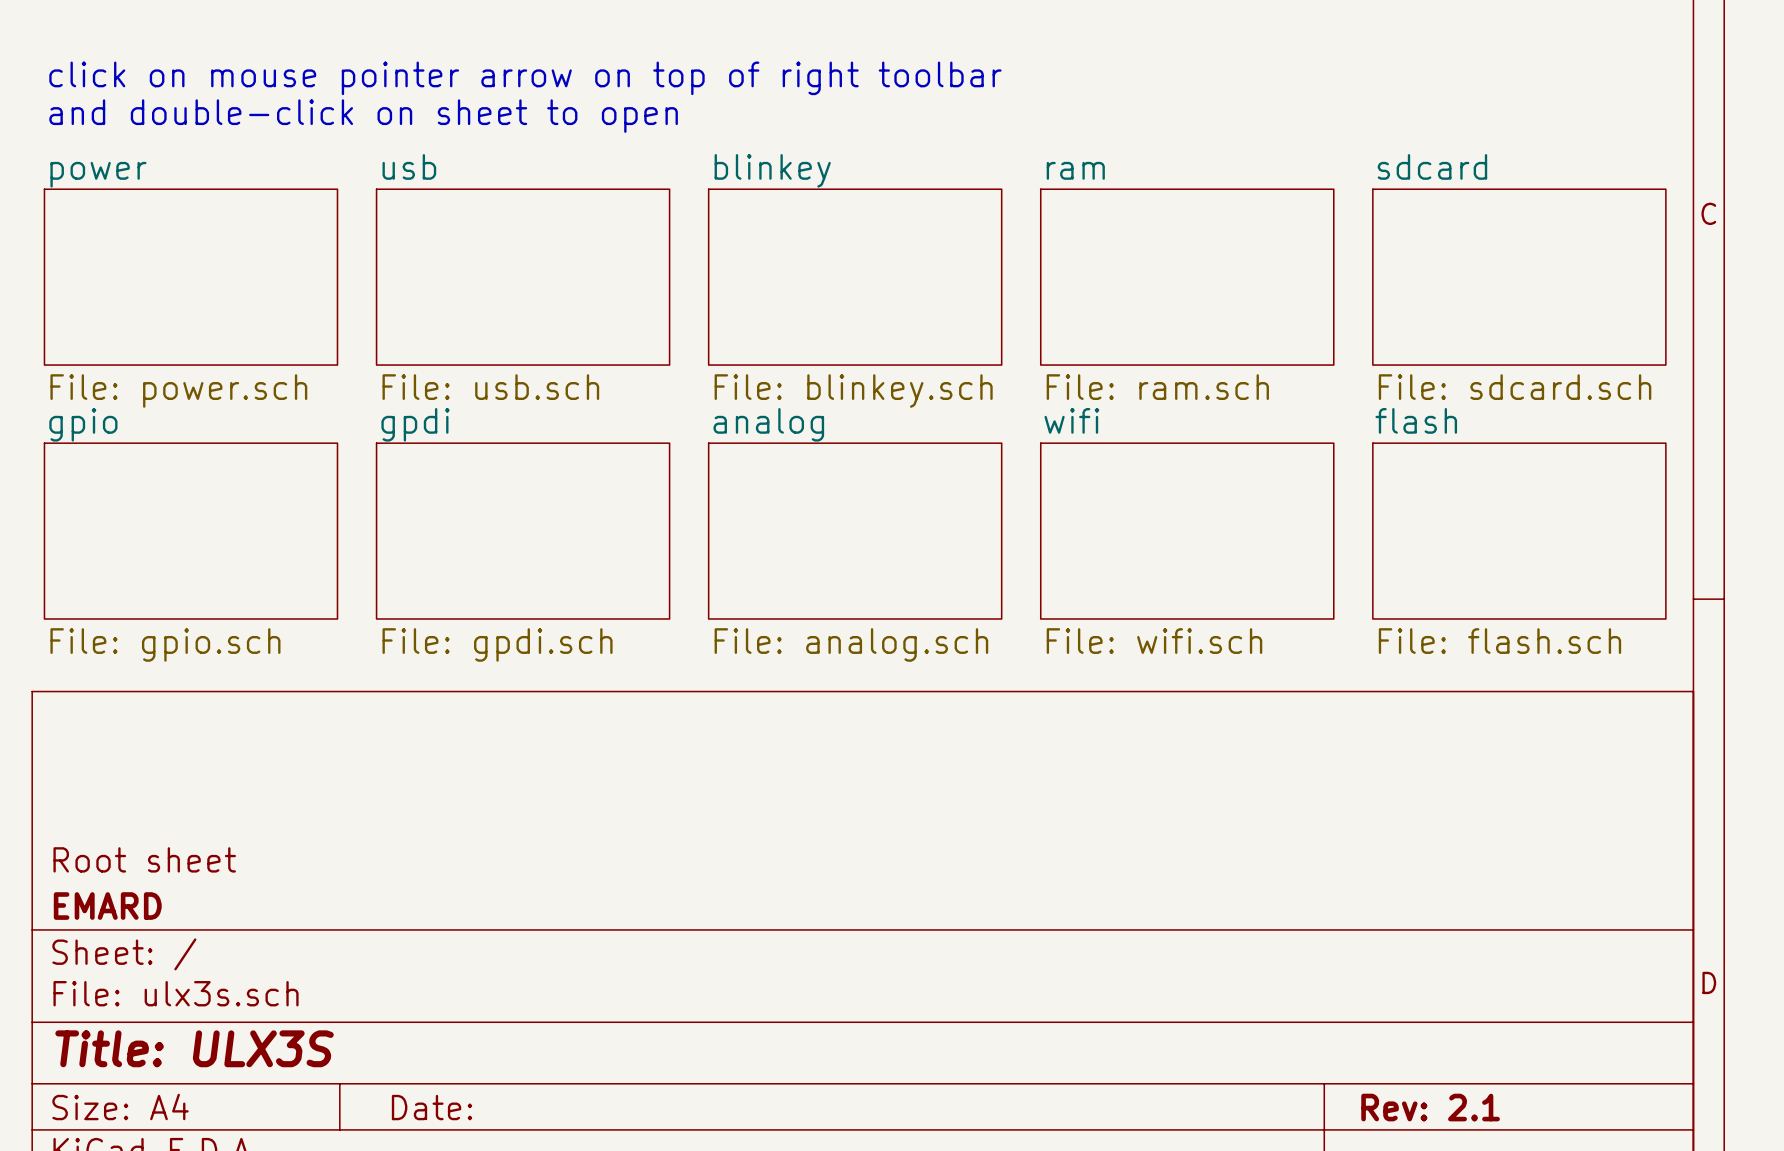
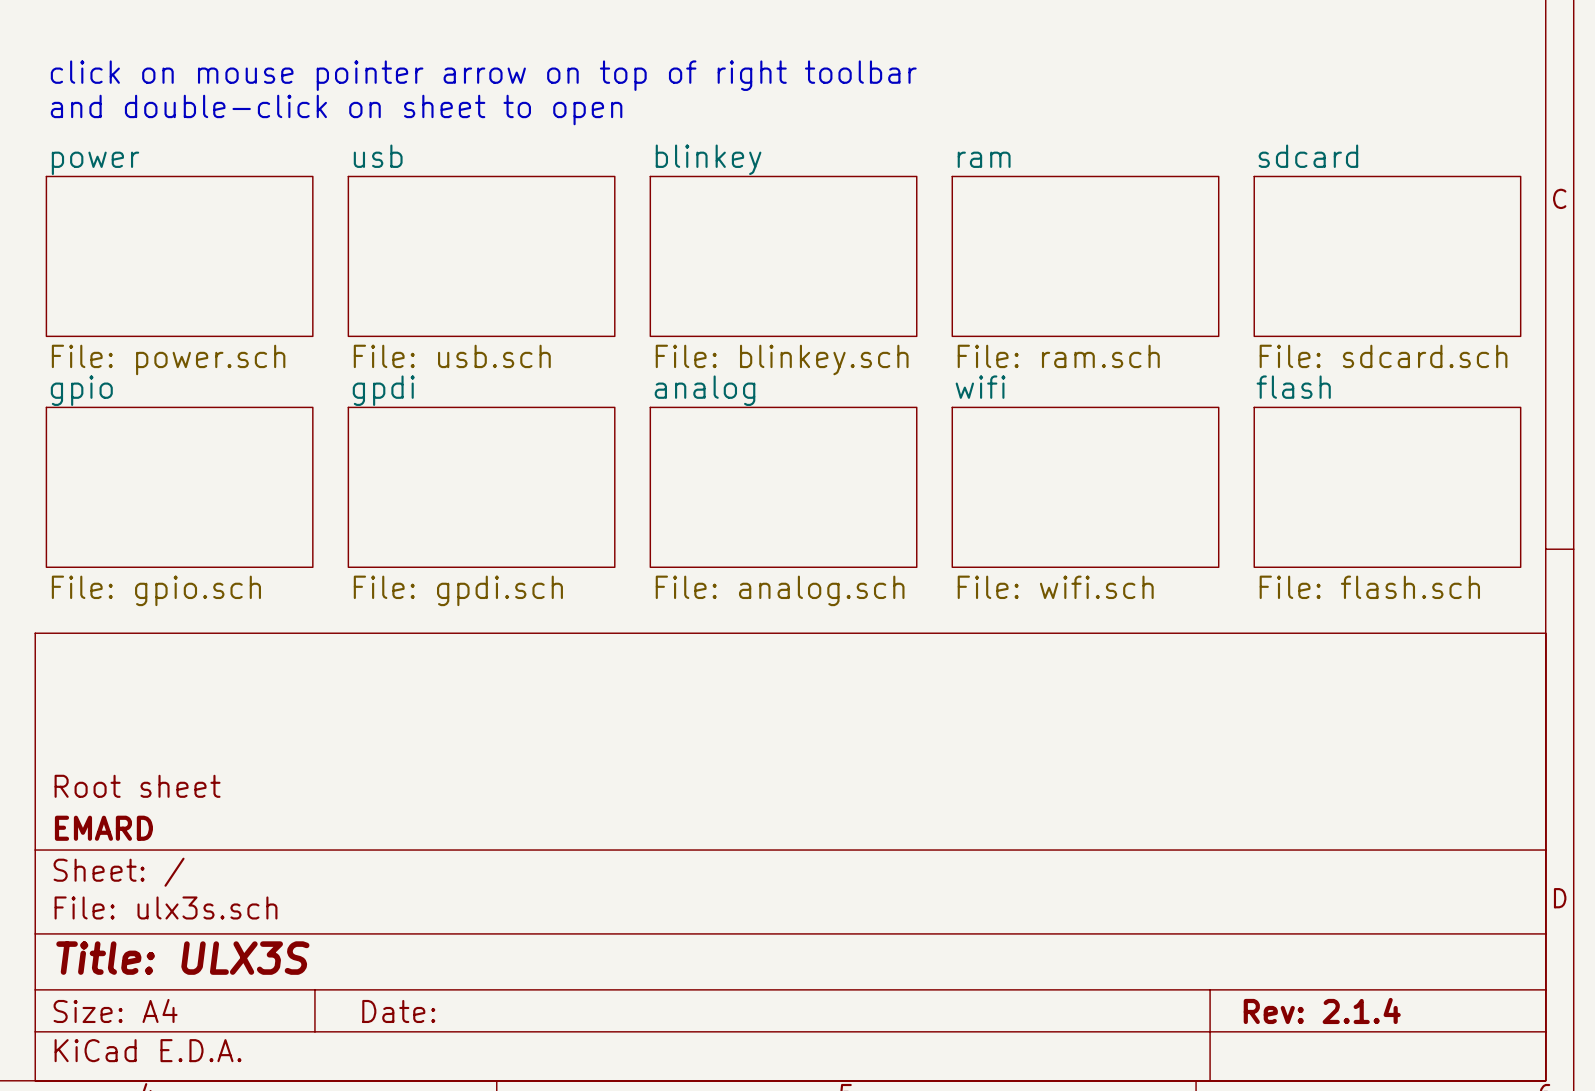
title block: Rev: 2.1 (1430, 1107) -> Rev: 2.1.4 (1322, 1010)

